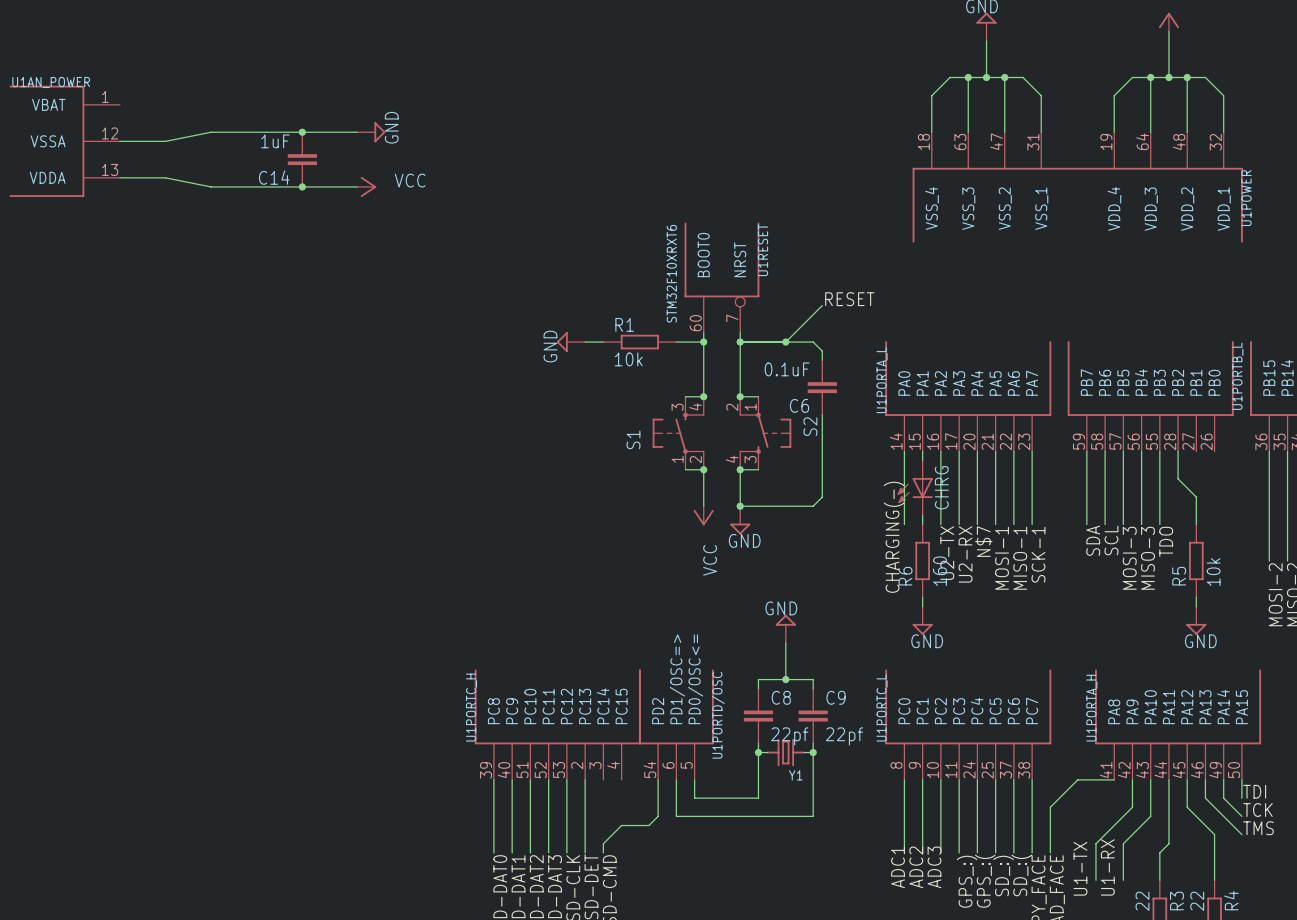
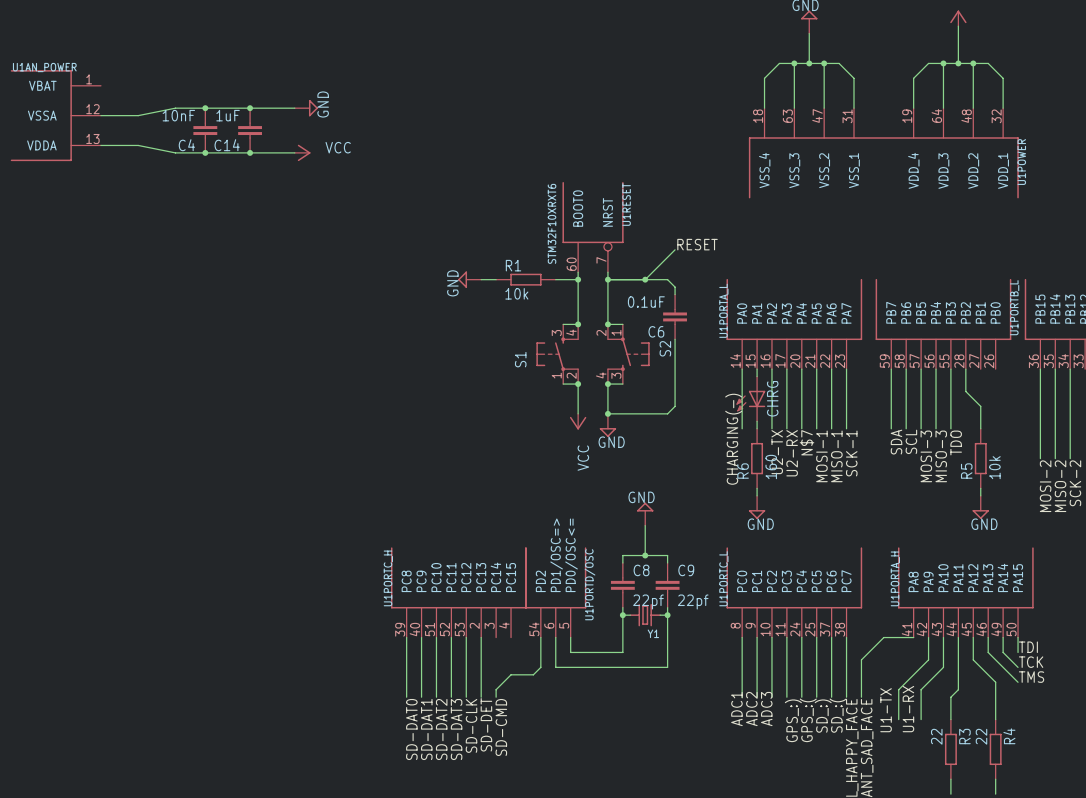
junction: none -> (205, 108)
C4: none -> 10nF (205, 130)
junction: none -> (205, 152)

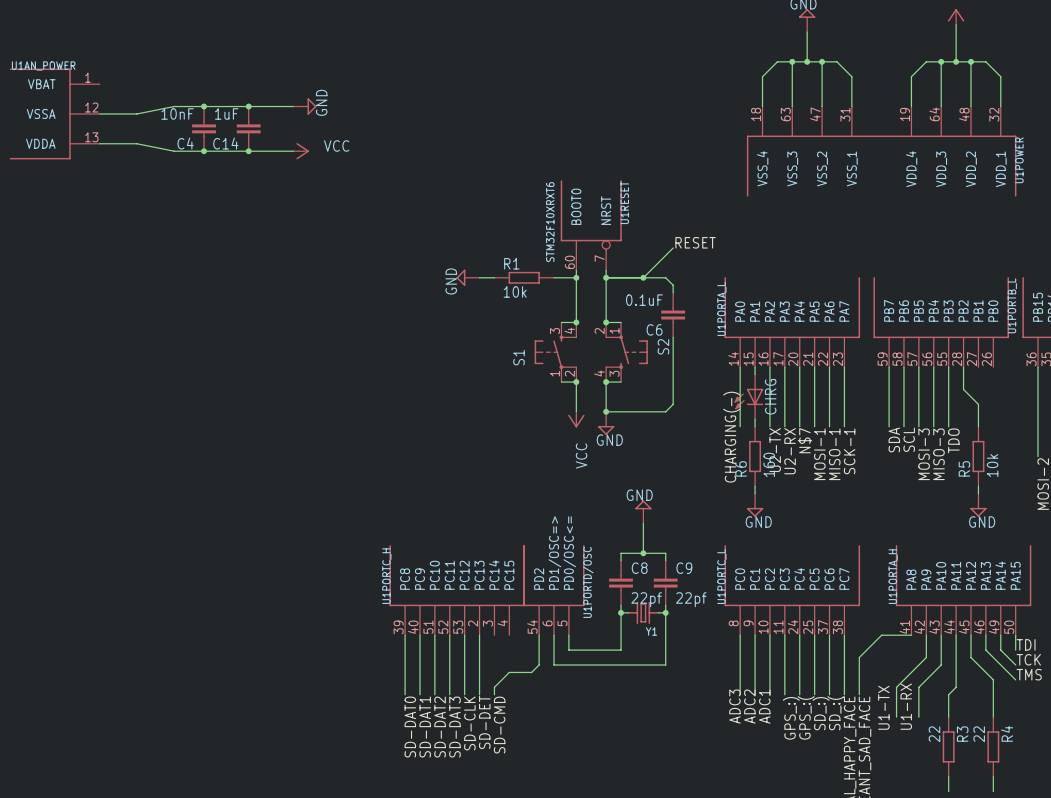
label: ADC1 (736, 709) -> ADC3 (734, 706)
label: ADC3 (766, 709) -> ADC1 (764, 706)

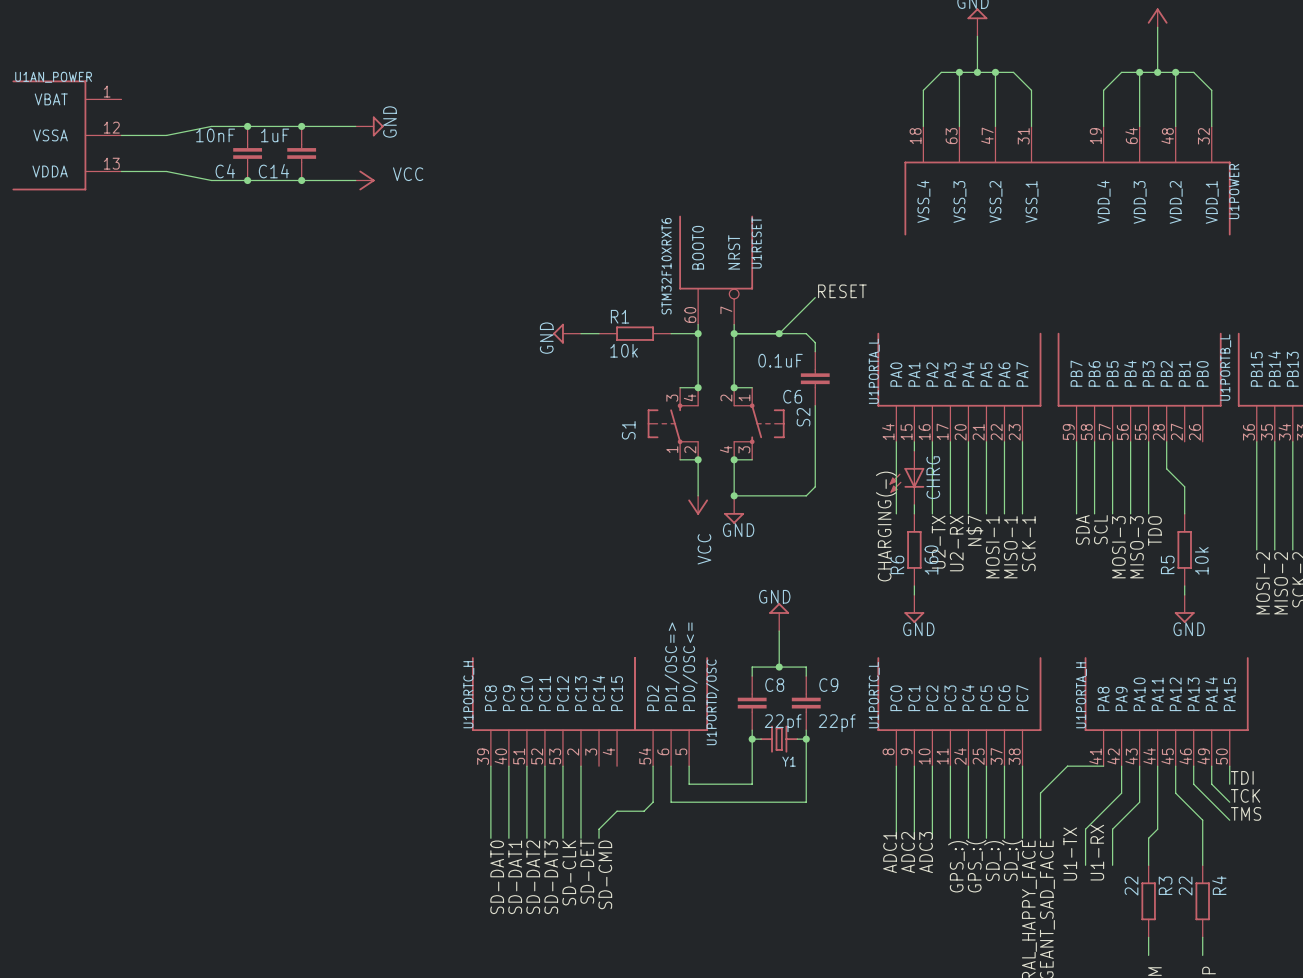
label: ADC3 (734, 706) -> ADC1 (890, 852)
label: ADC1 (764, 706) -> ADC3 (926, 852)

